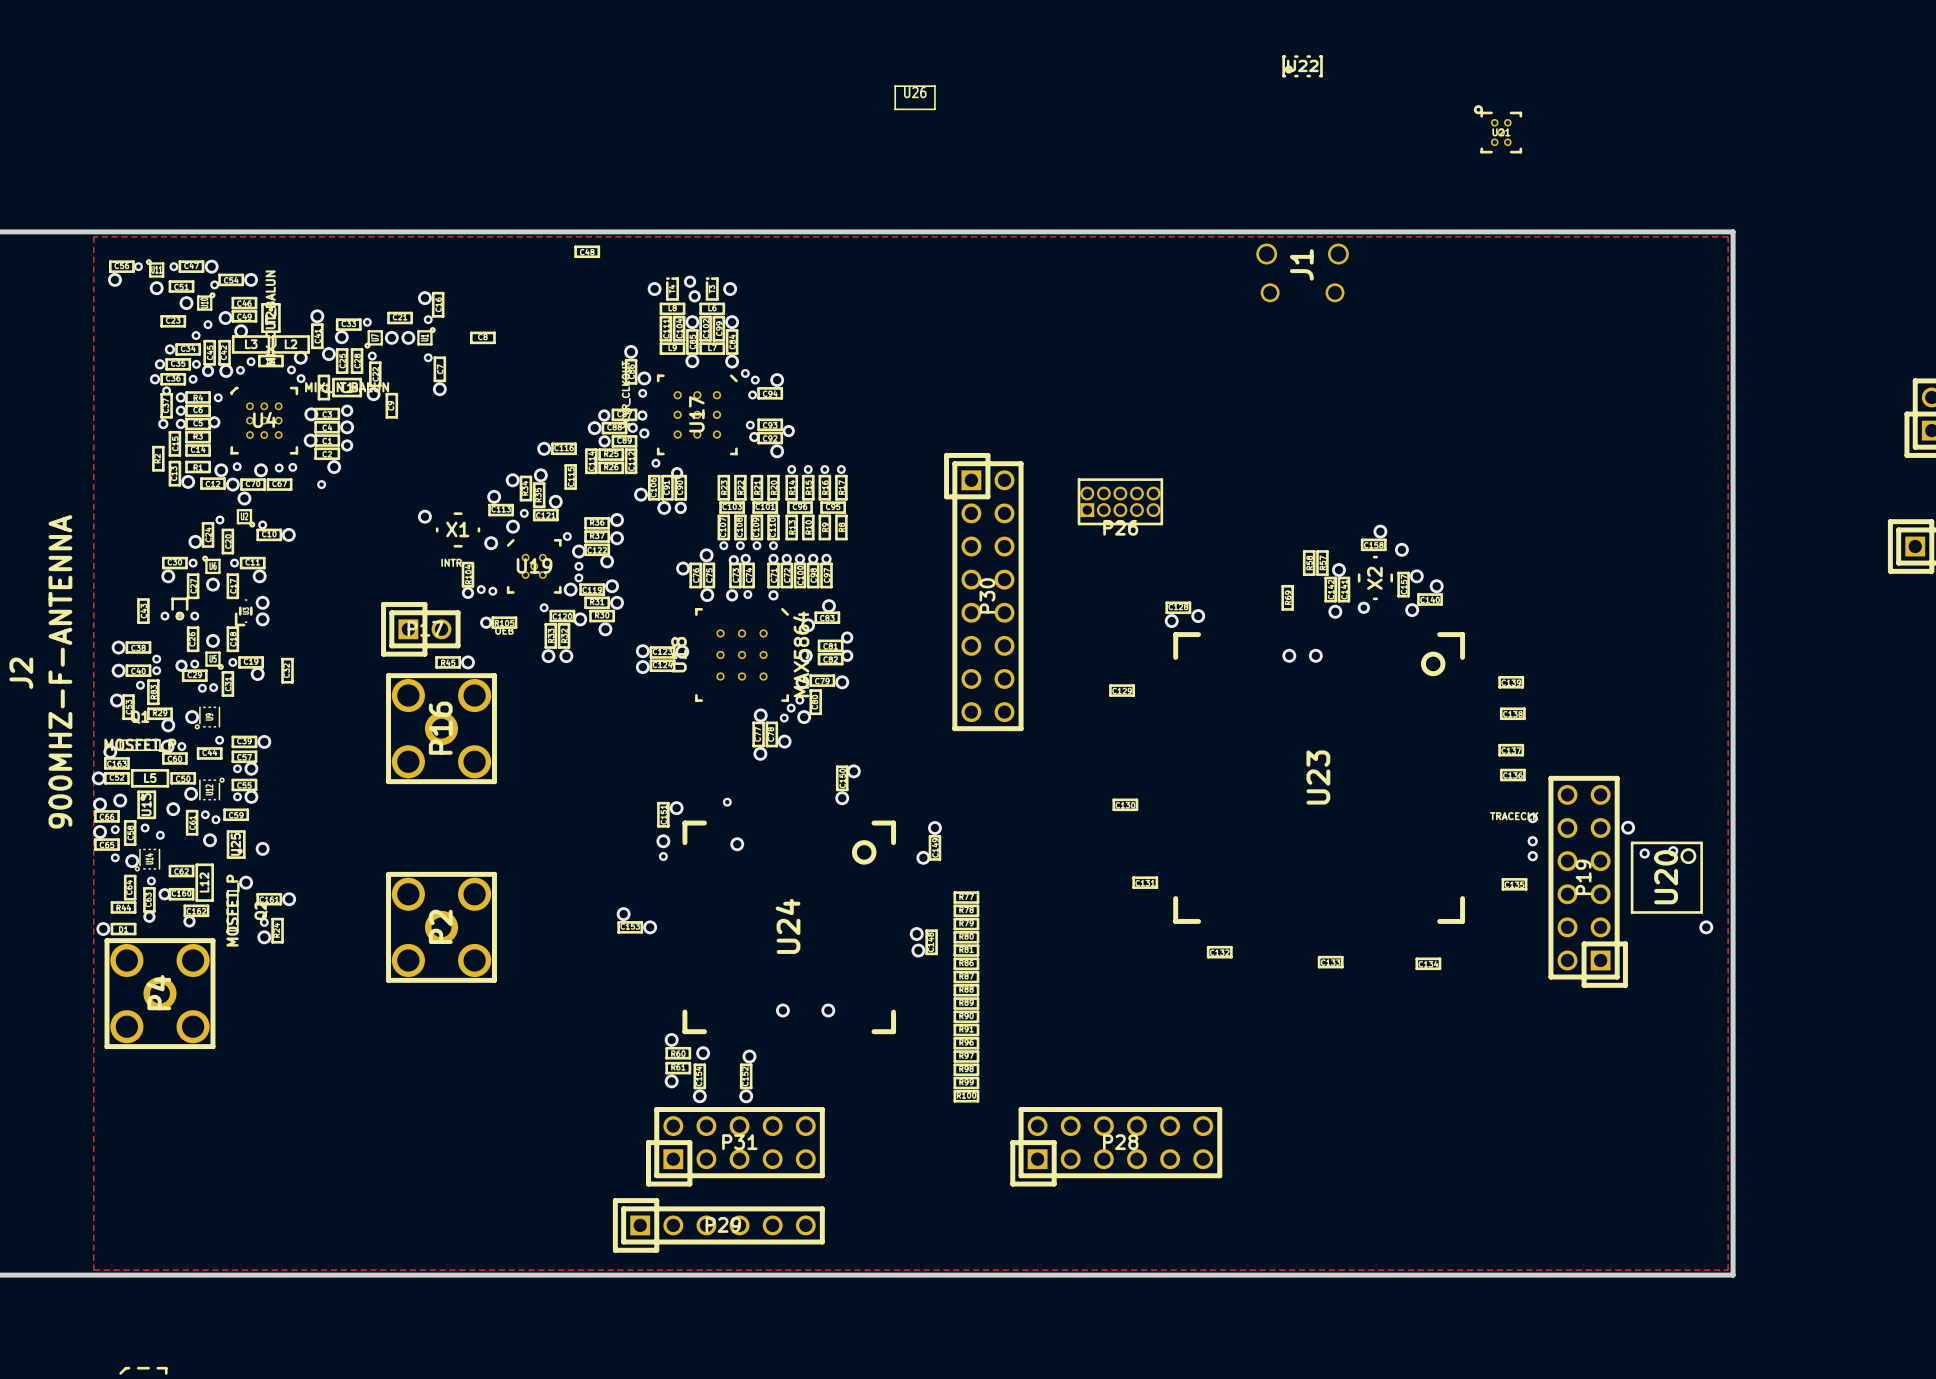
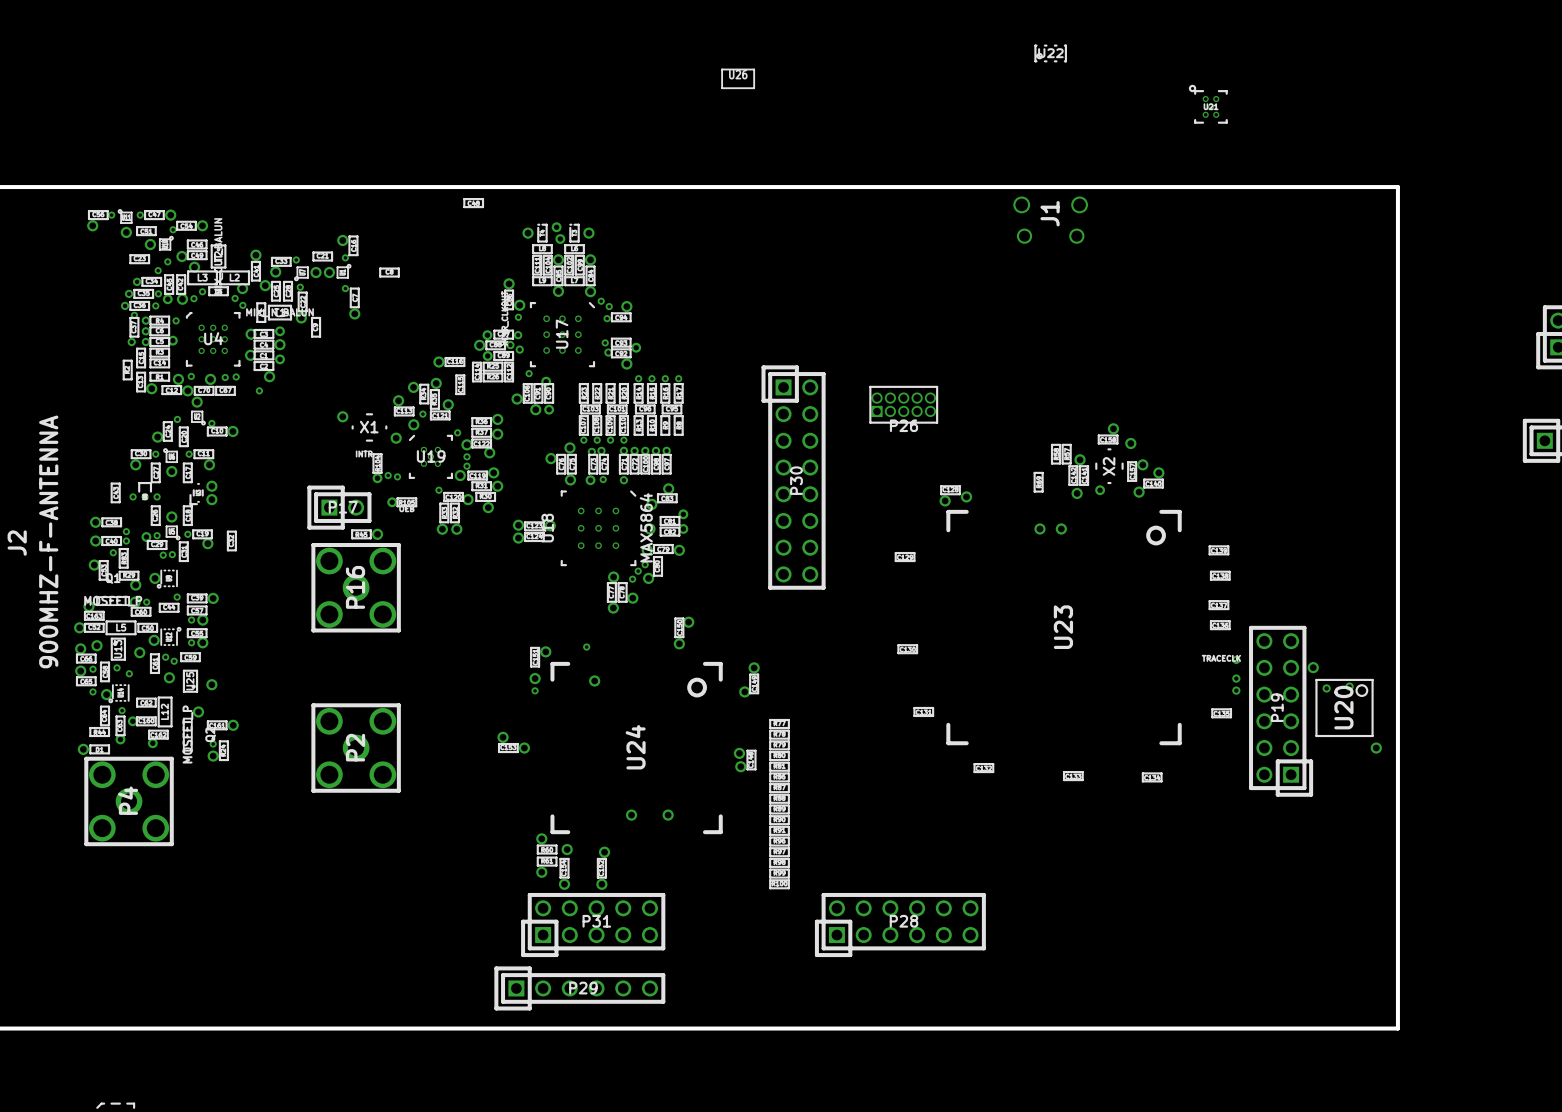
zone outline: (93, 236) (1728, 236) (1728, 1270) (93, 1270) (93, 236) -> none

